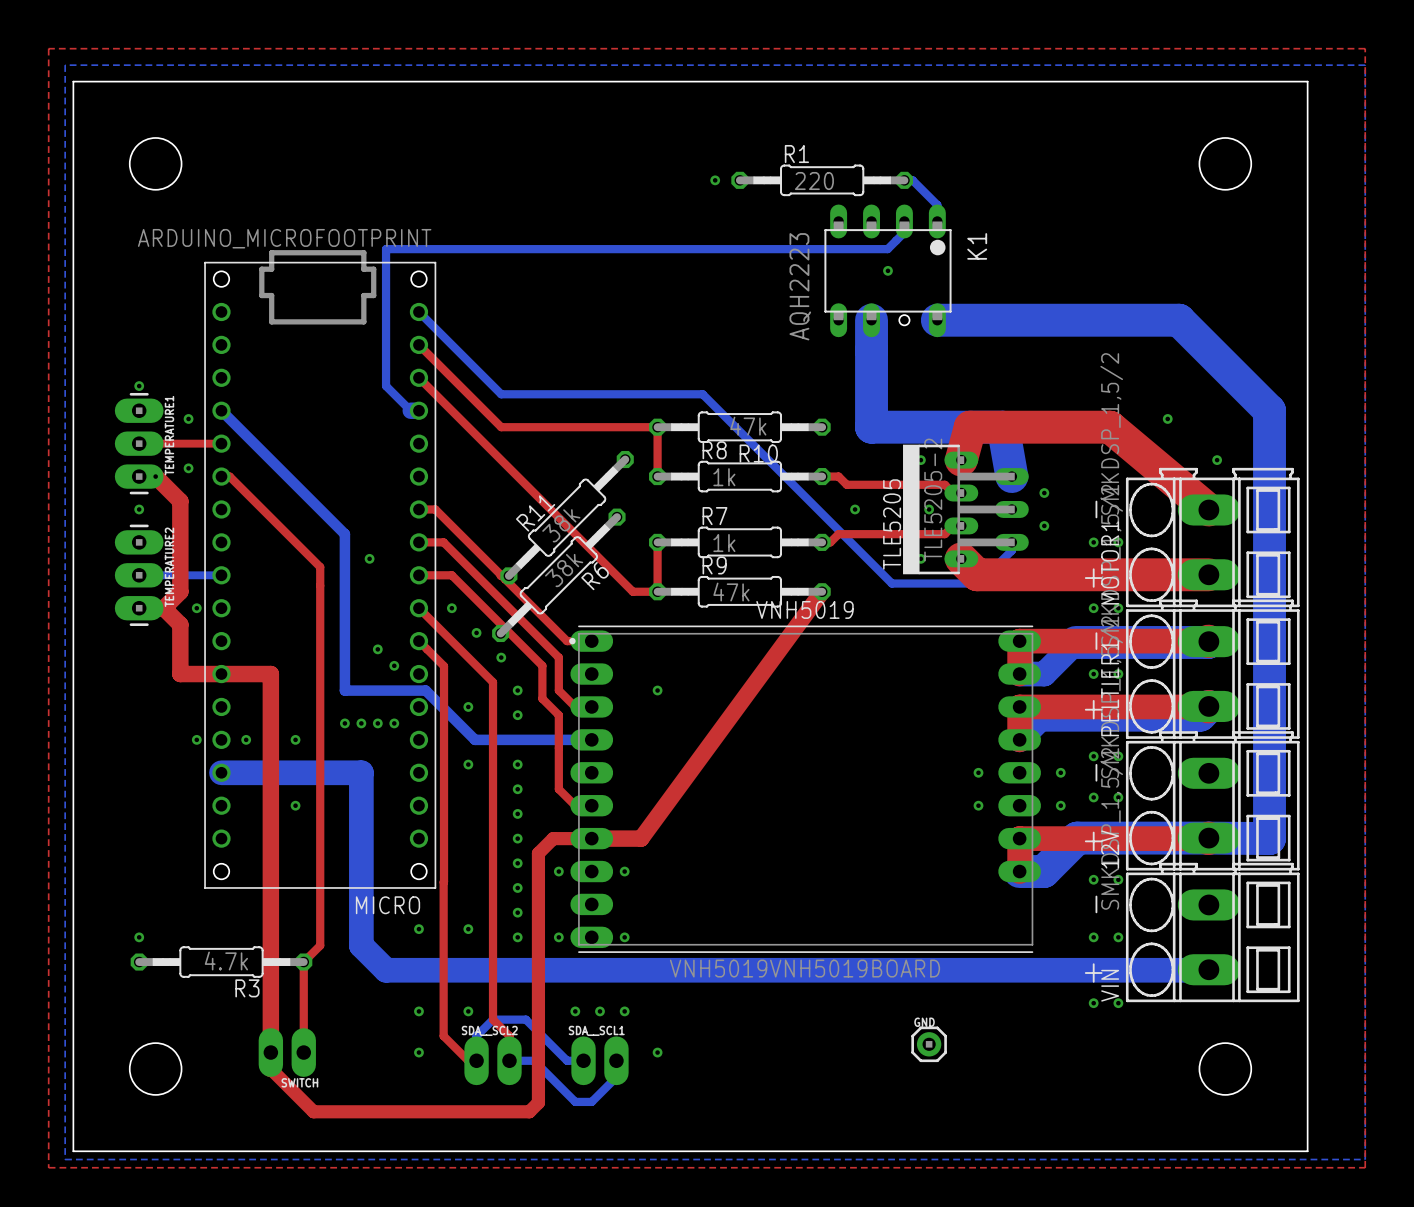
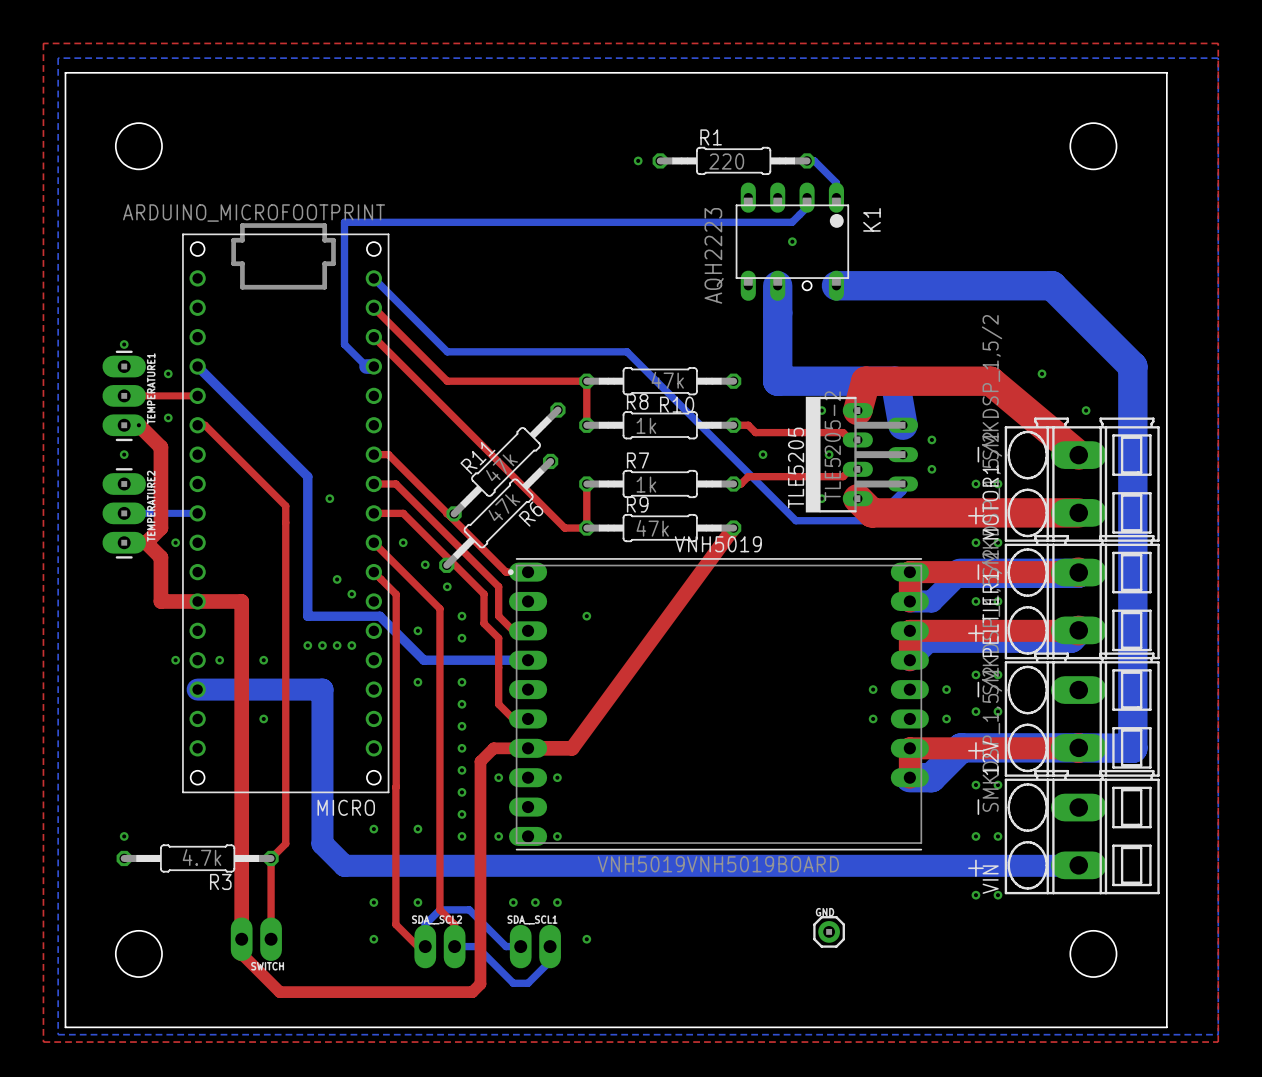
R11 value: 38k (561, 525) -> 47k (501, 467)
R6 value: 38k (564, 570) -> 47k (504, 507)

